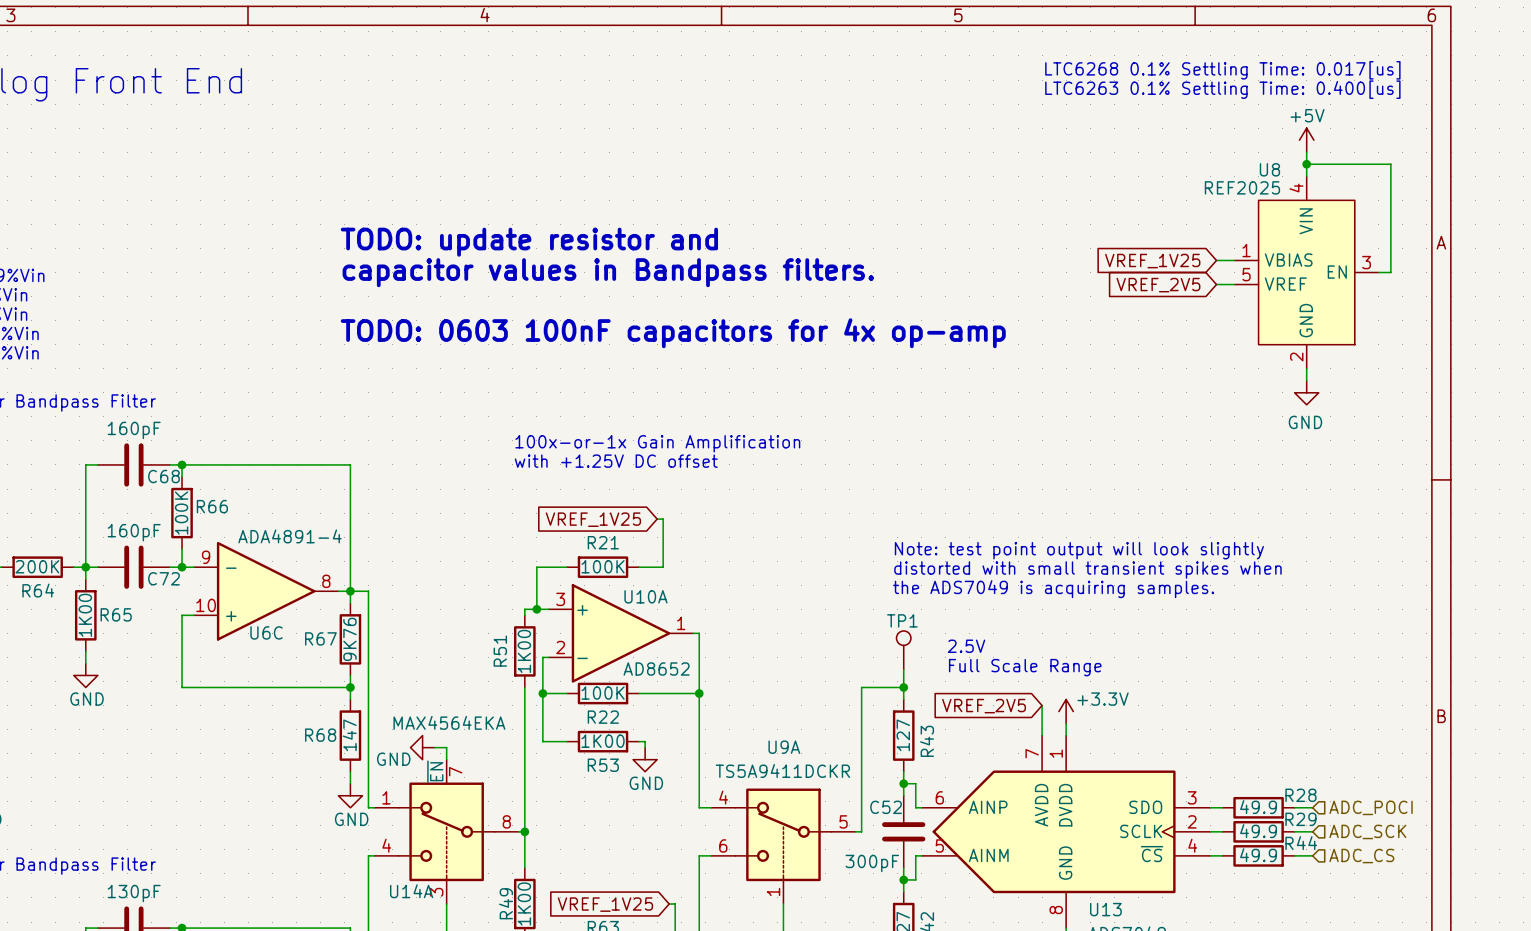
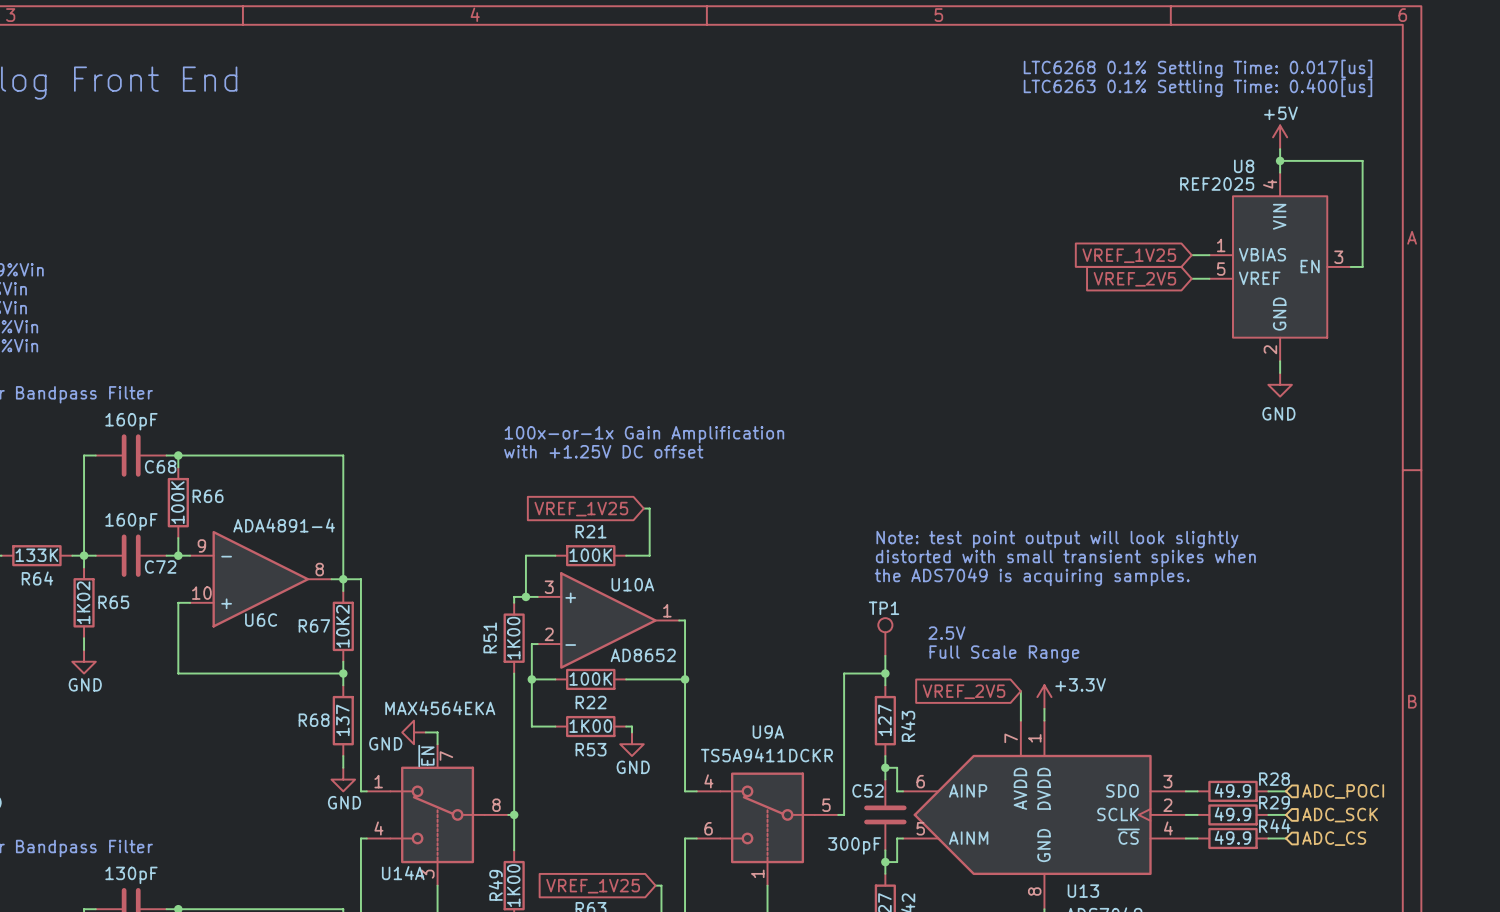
text: TODO: update resistor and (529, 242) -> none
text: capacitor values in Bandpass filters. (608, 272) -> none
text: TODO: 0603 100nF capacitors for 4x op-amp (673, 333) -> none
R64 value: 200K (37, 566) -> 133K (36, 555)
R65 value: 1K00 (85, 615) -> 1K02 (83, 602)
R67 value: 9K76 (349, 639) -> 10K2 (342, 626)
R68 value: 147 (349, 735) -> 137 (342, 720)

